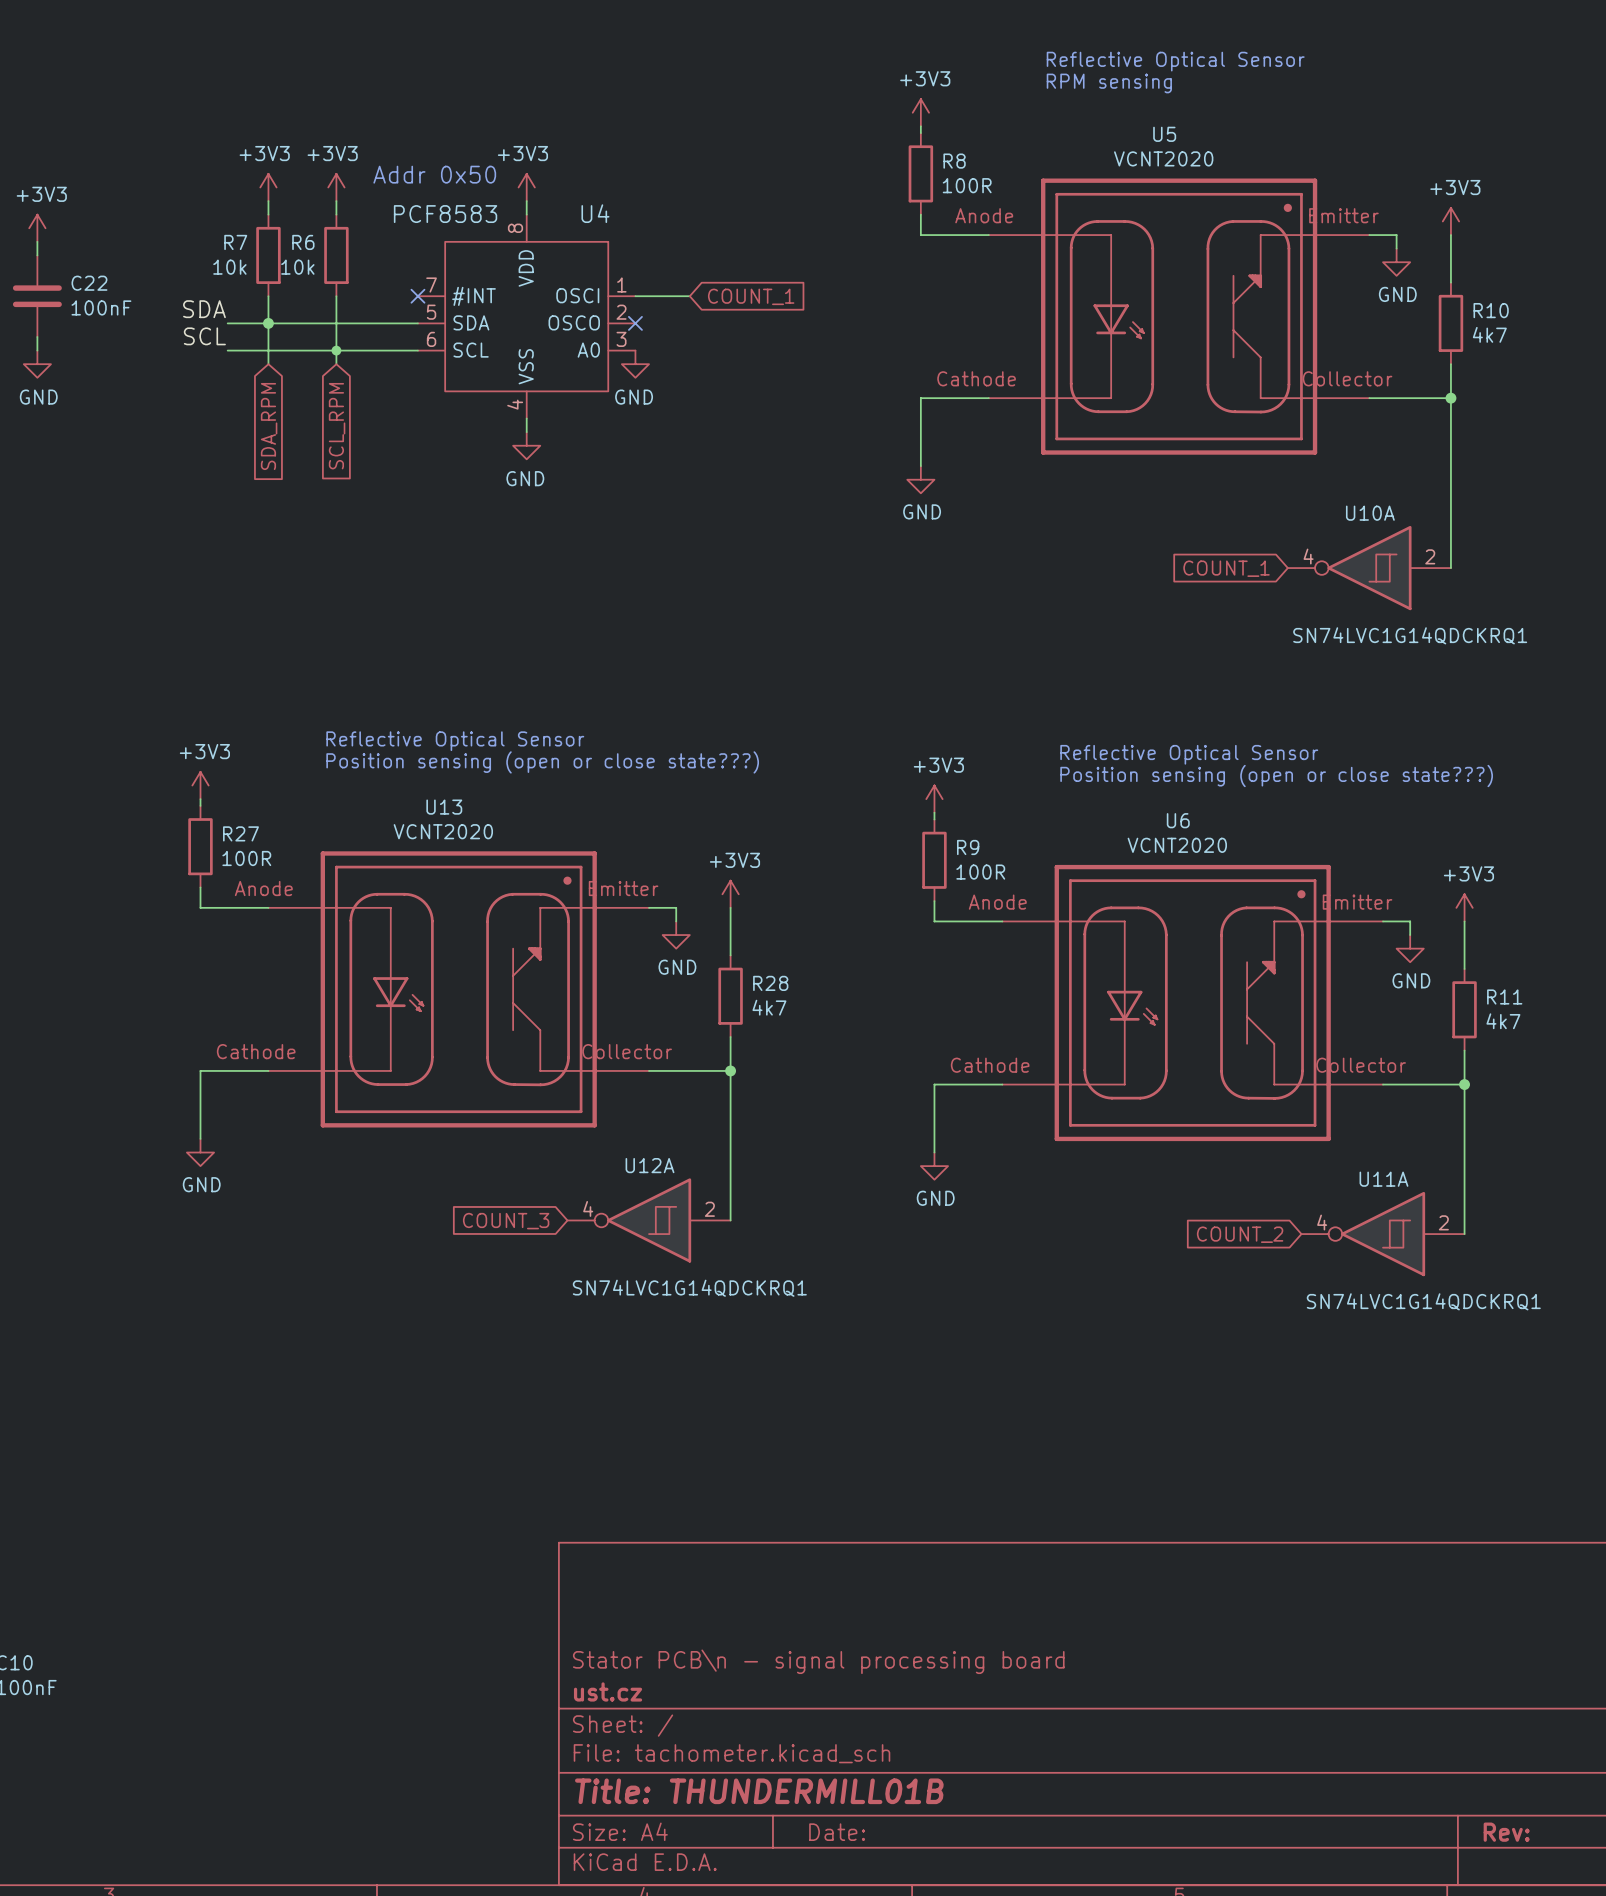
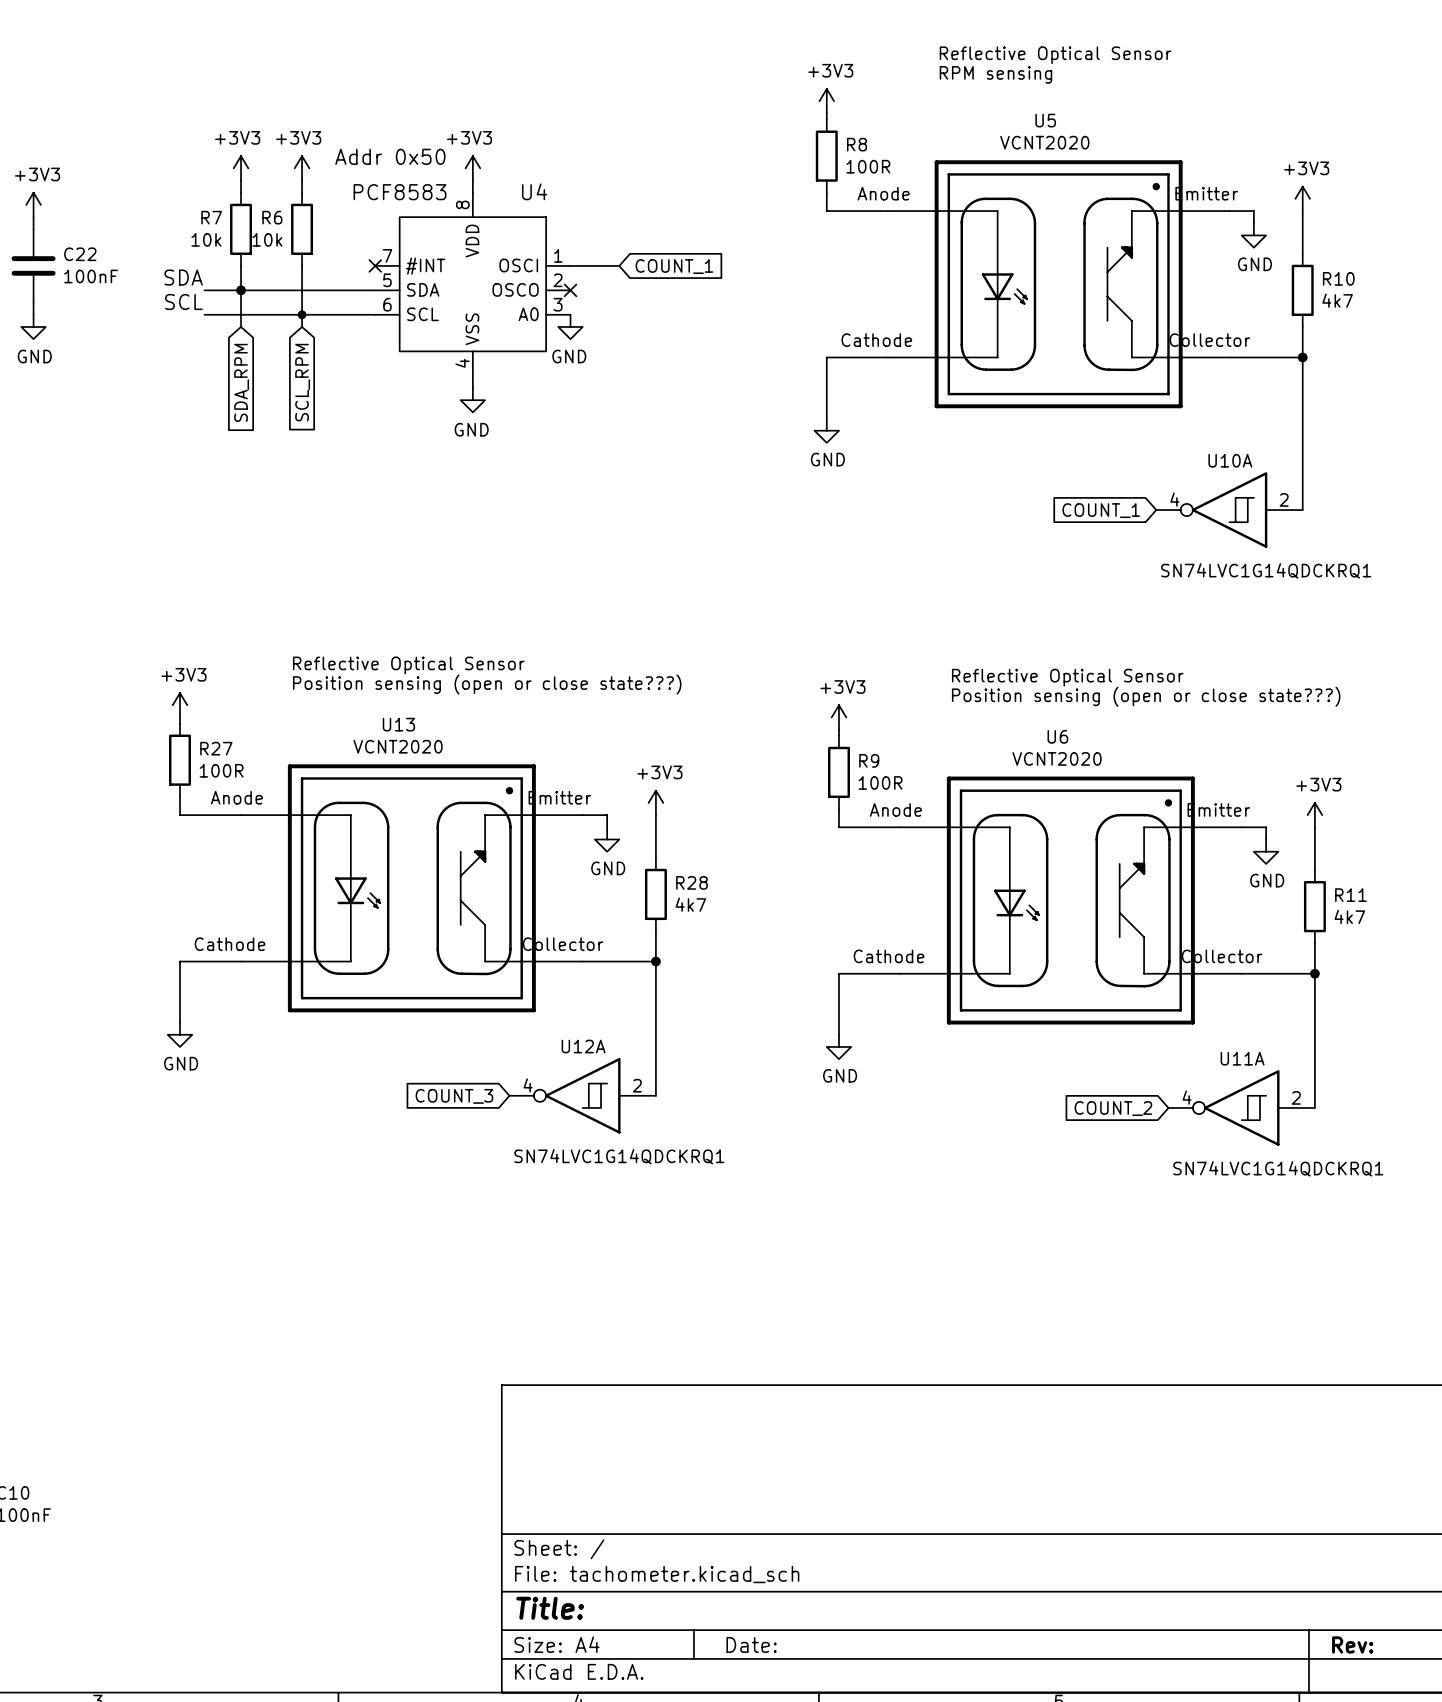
title block: Stator PCB\n - signal processing board (818, 1661) -> none
title block: ust.cz (608, 1691) -> none
title block: Title: THUNDERMILL01B (759, 1791) -> Title: (550, 1608)

